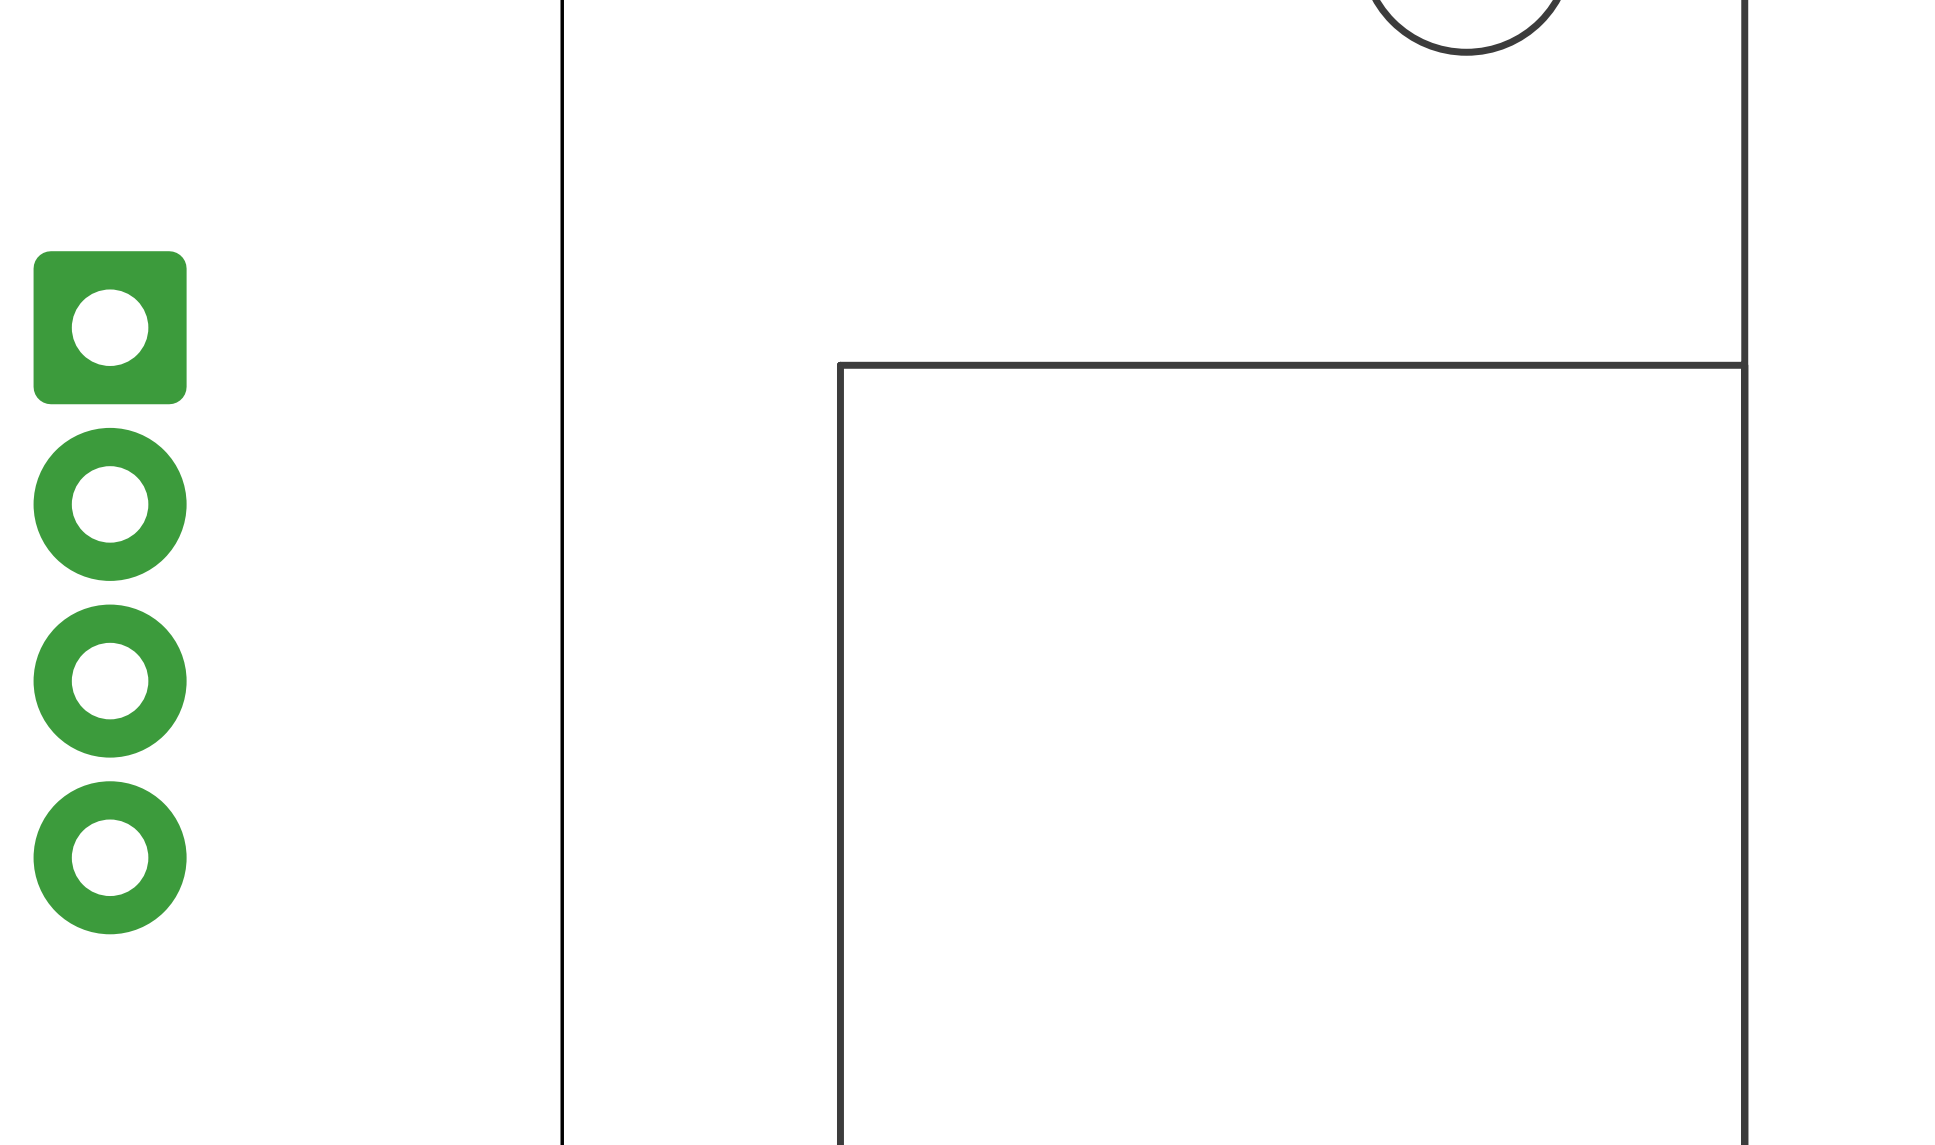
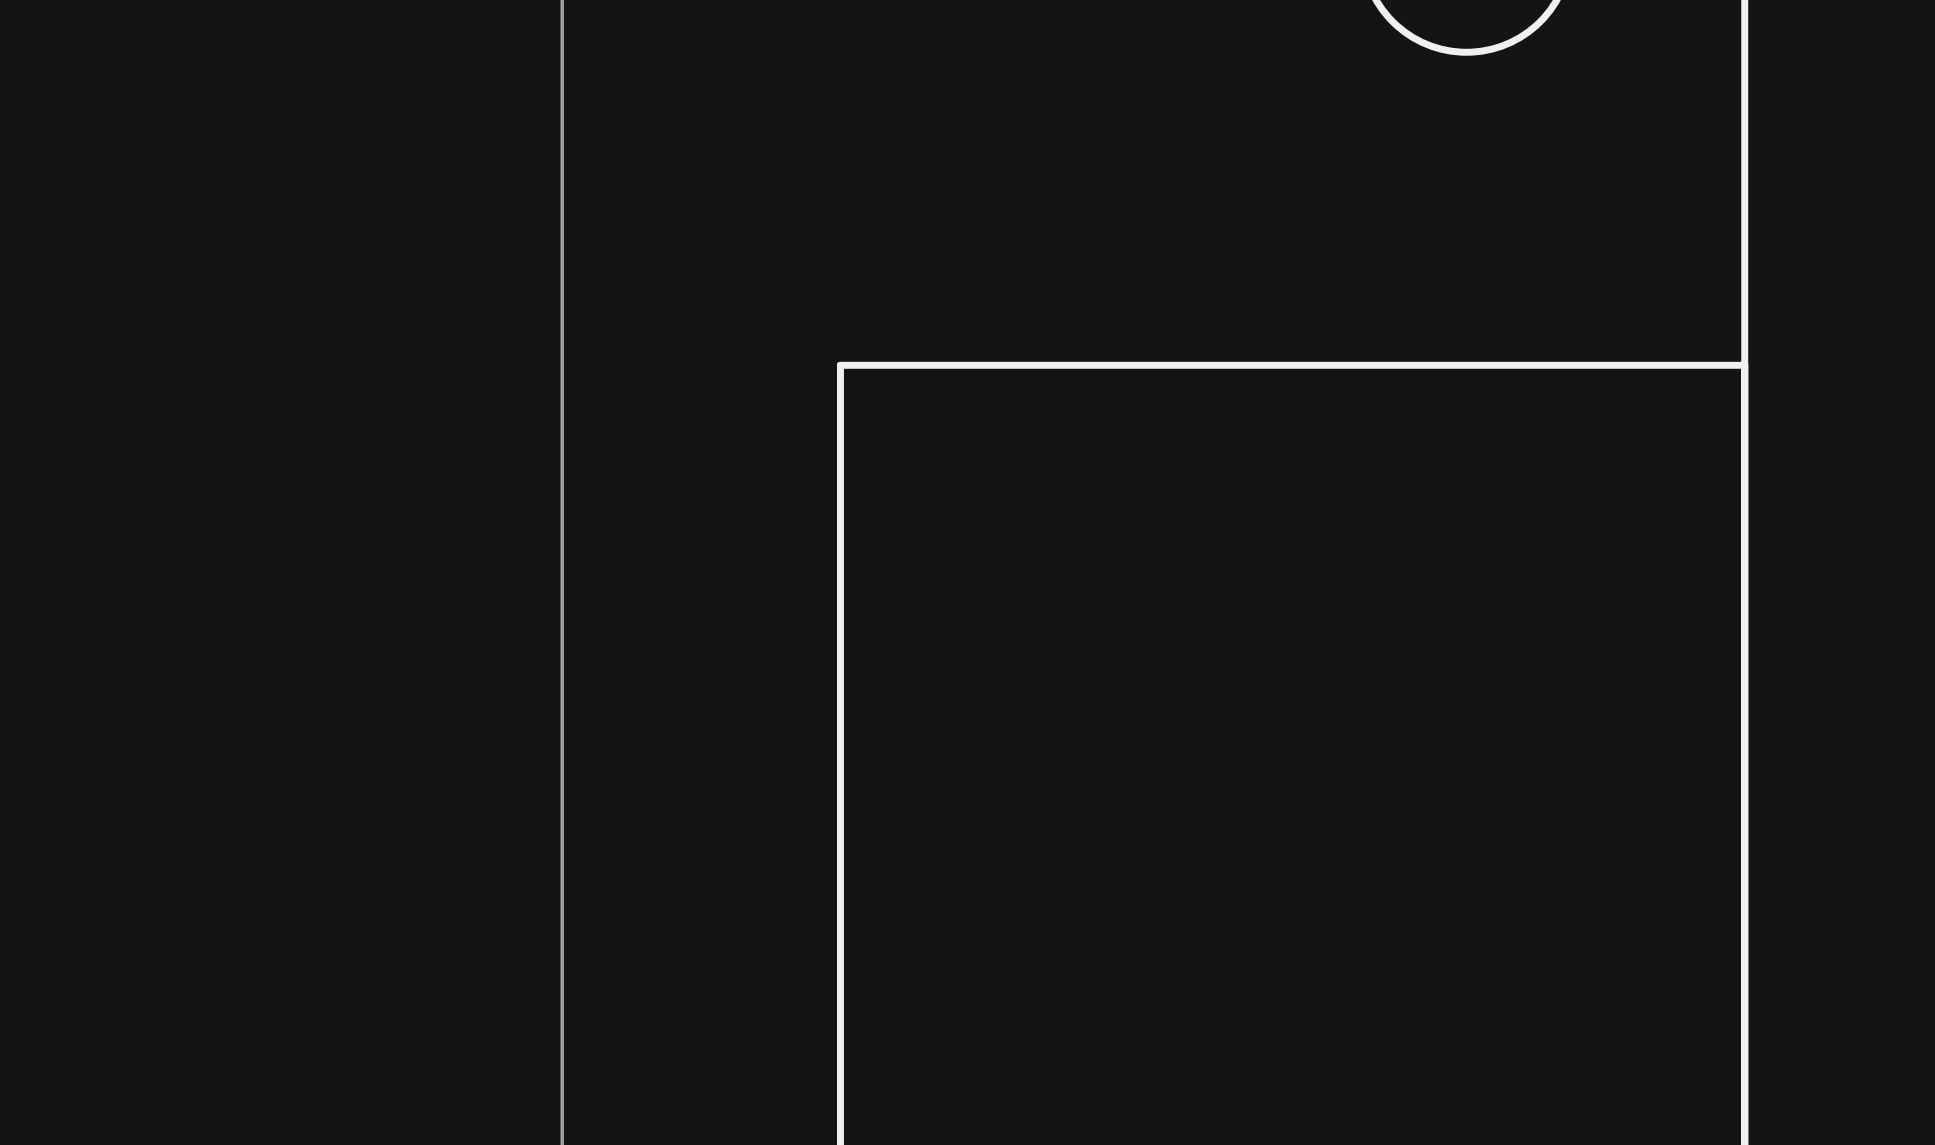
part: (110, 592) -> none

